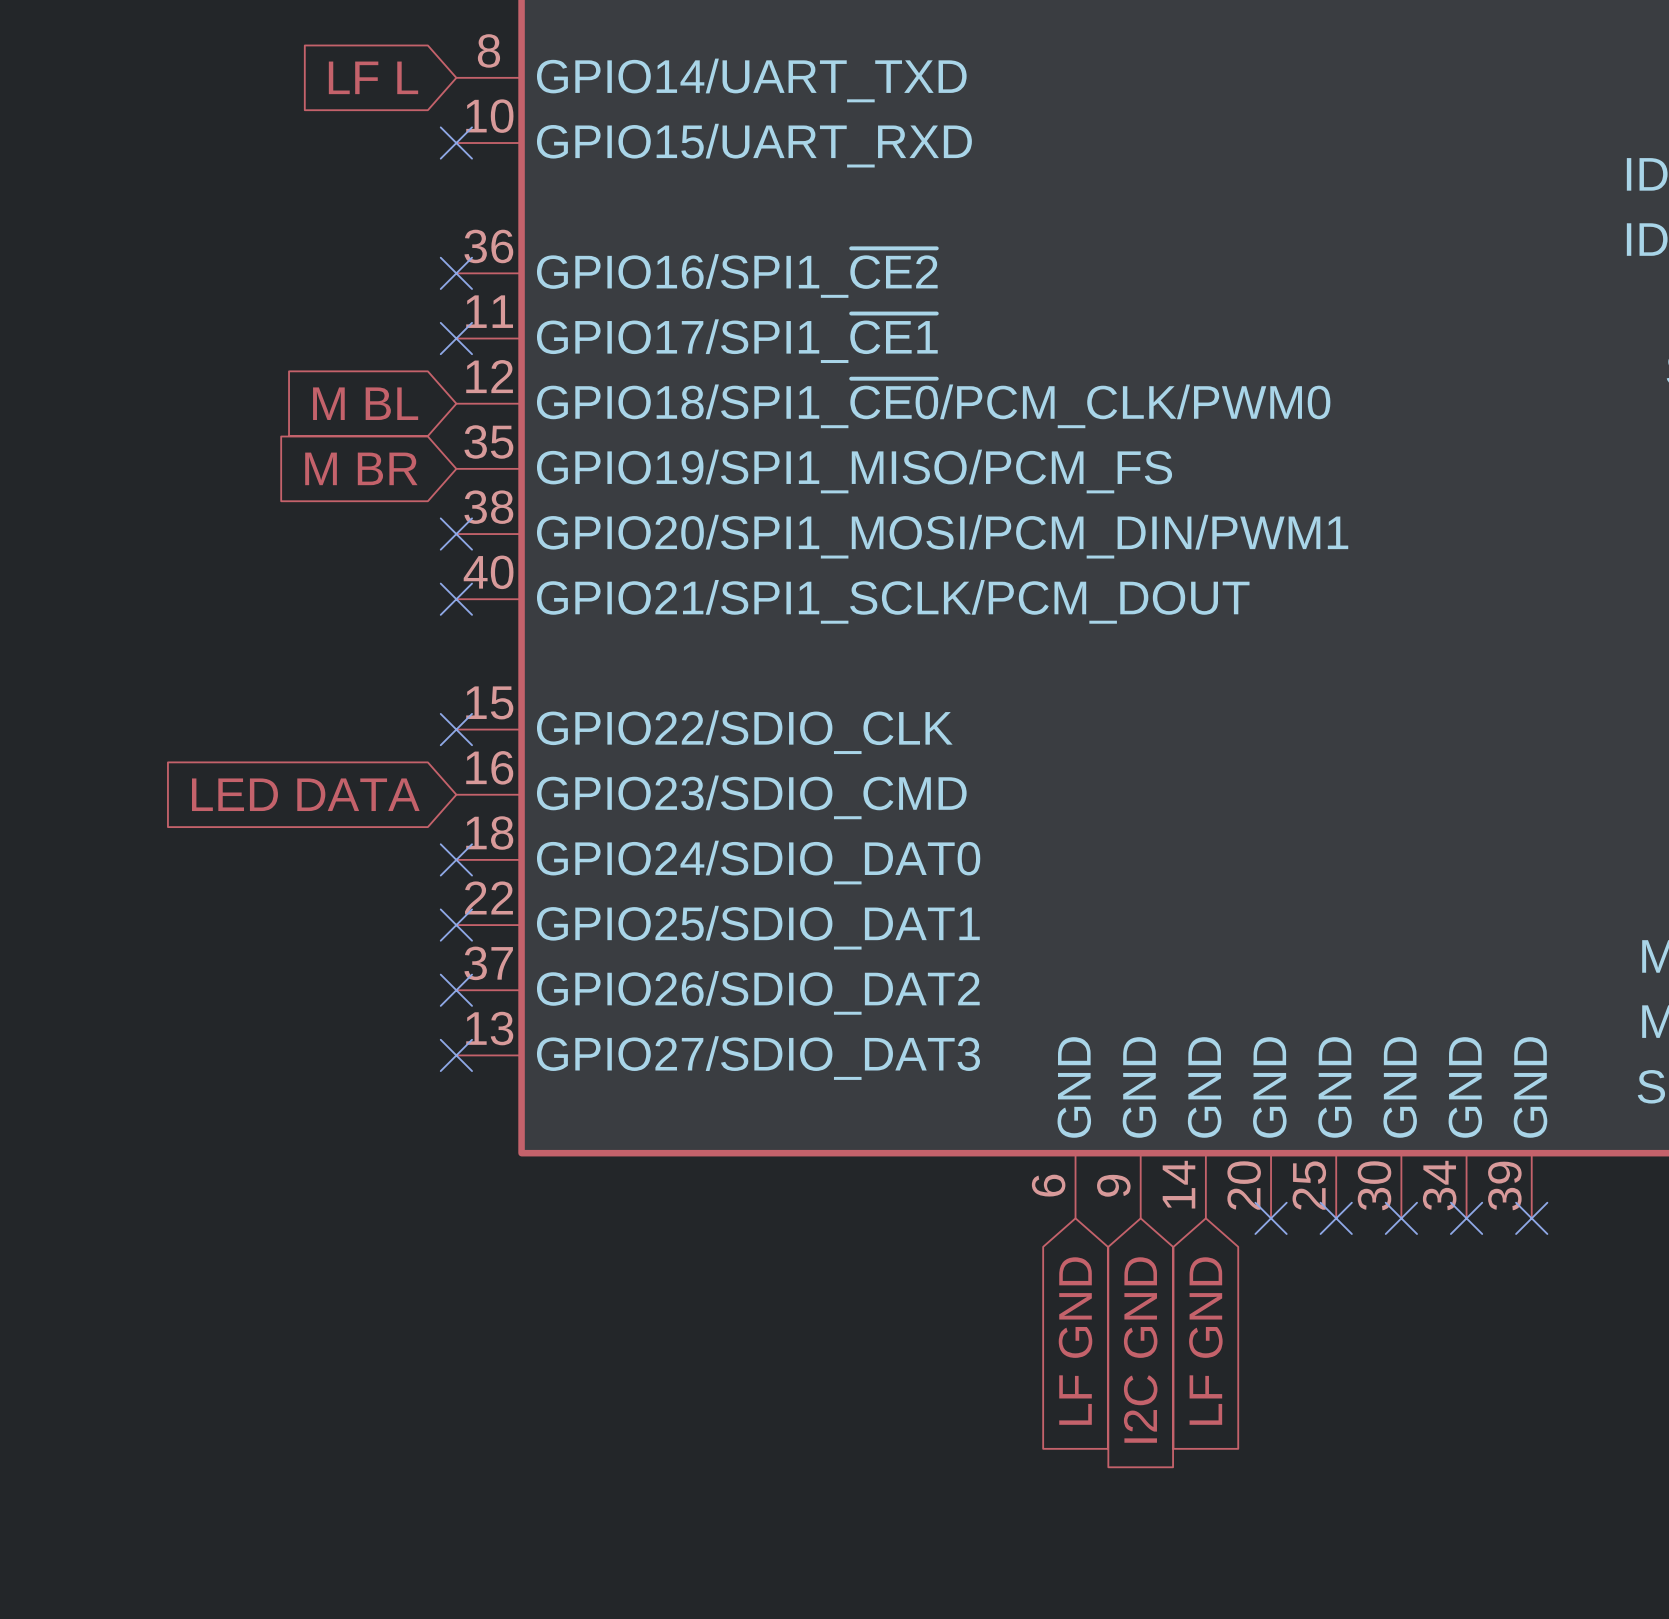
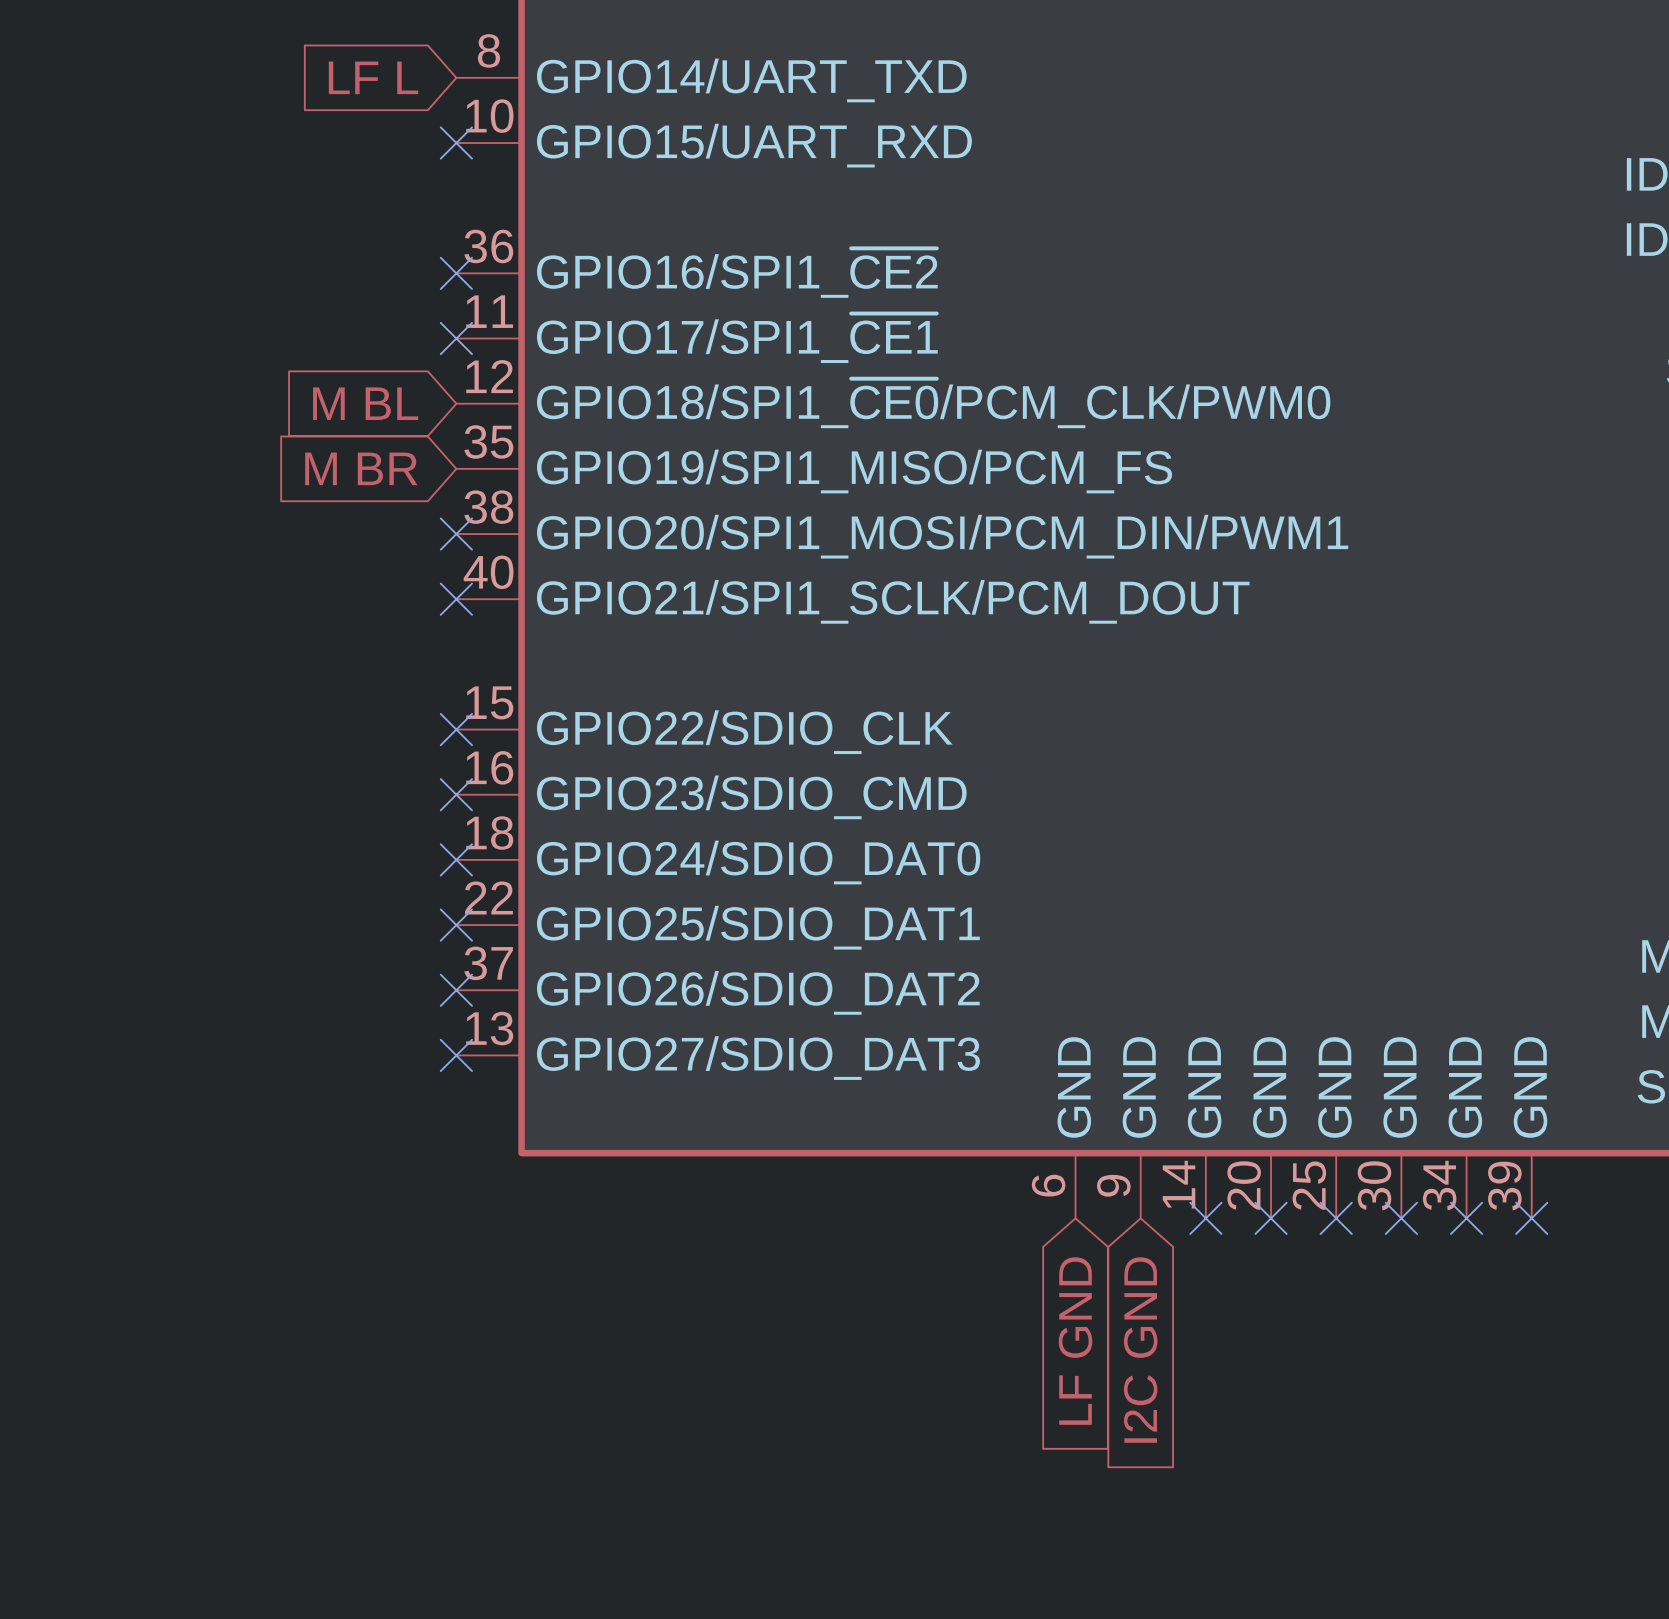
global label: LED DATA (305, 794) -> none
no-connect mark: none -> (456, 794)
no-connect mark: none -> (1205, 1218)
global label: LF GND (1205, 1341) -> none

